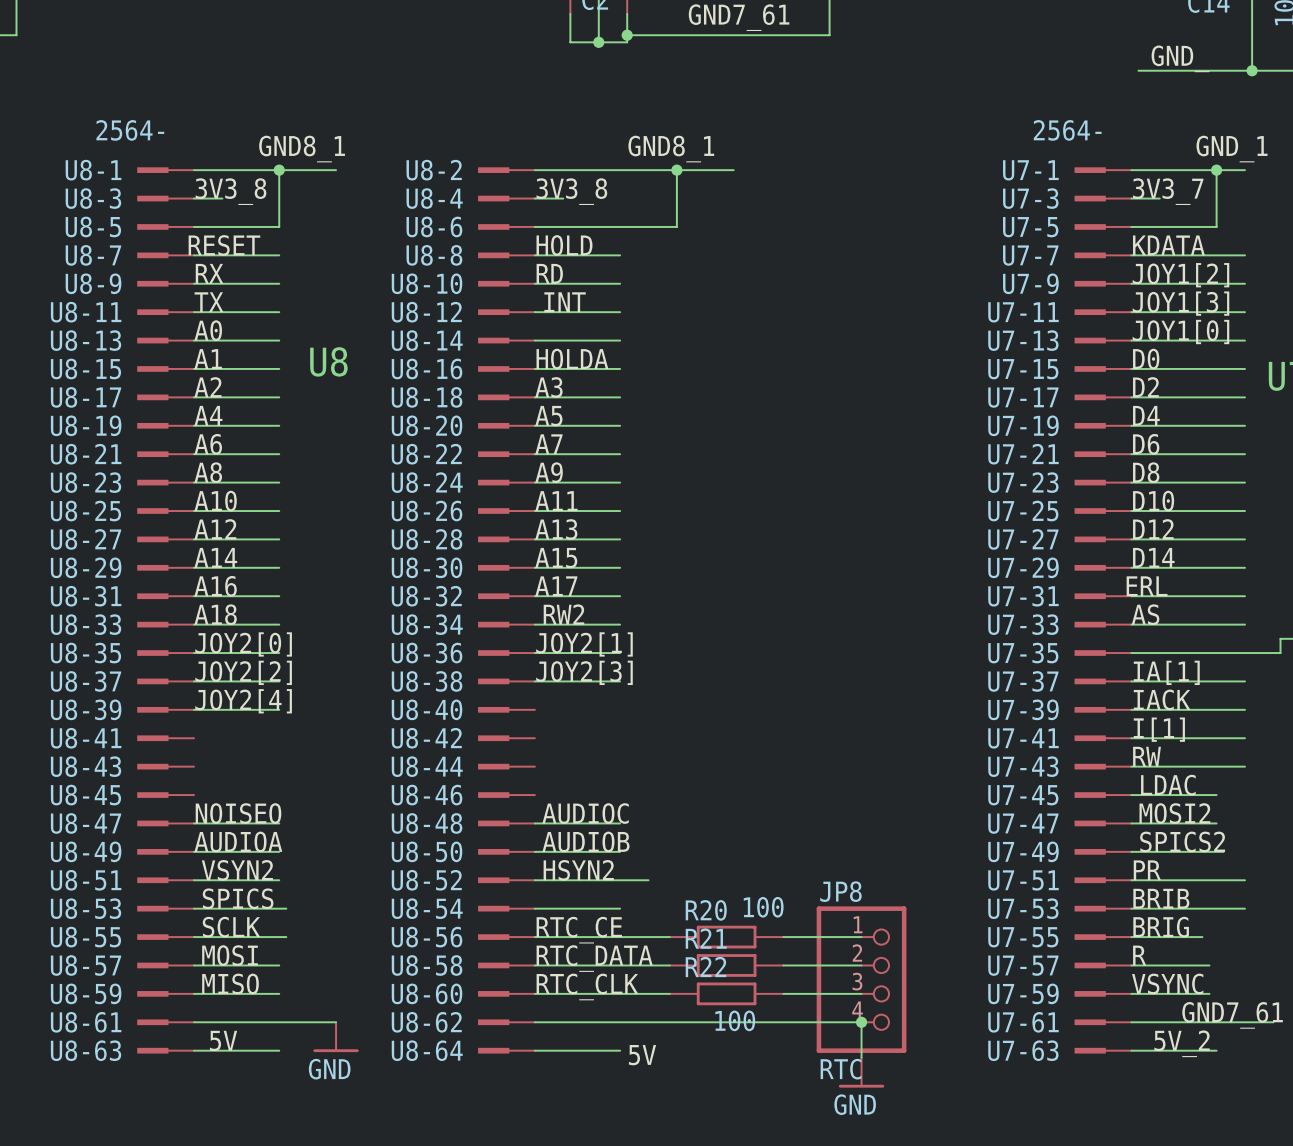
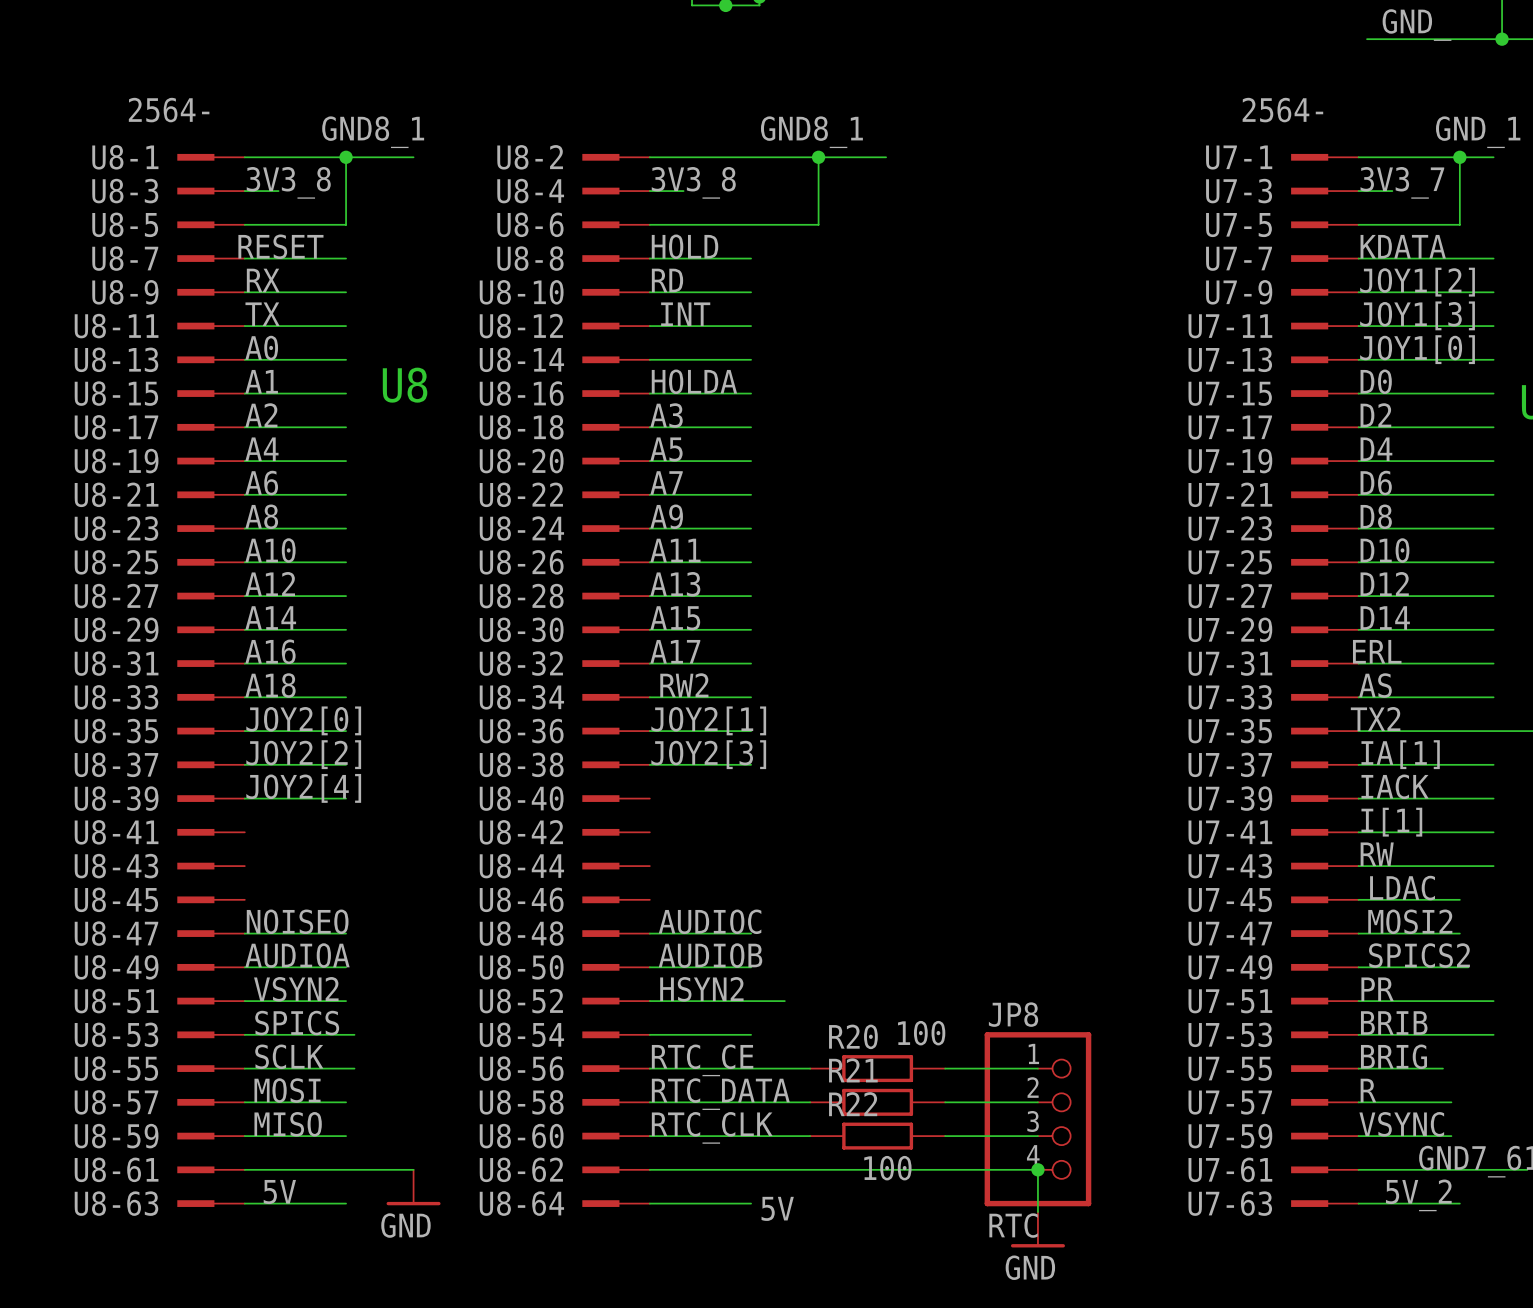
label: none -> TX2 (1375, 719)

